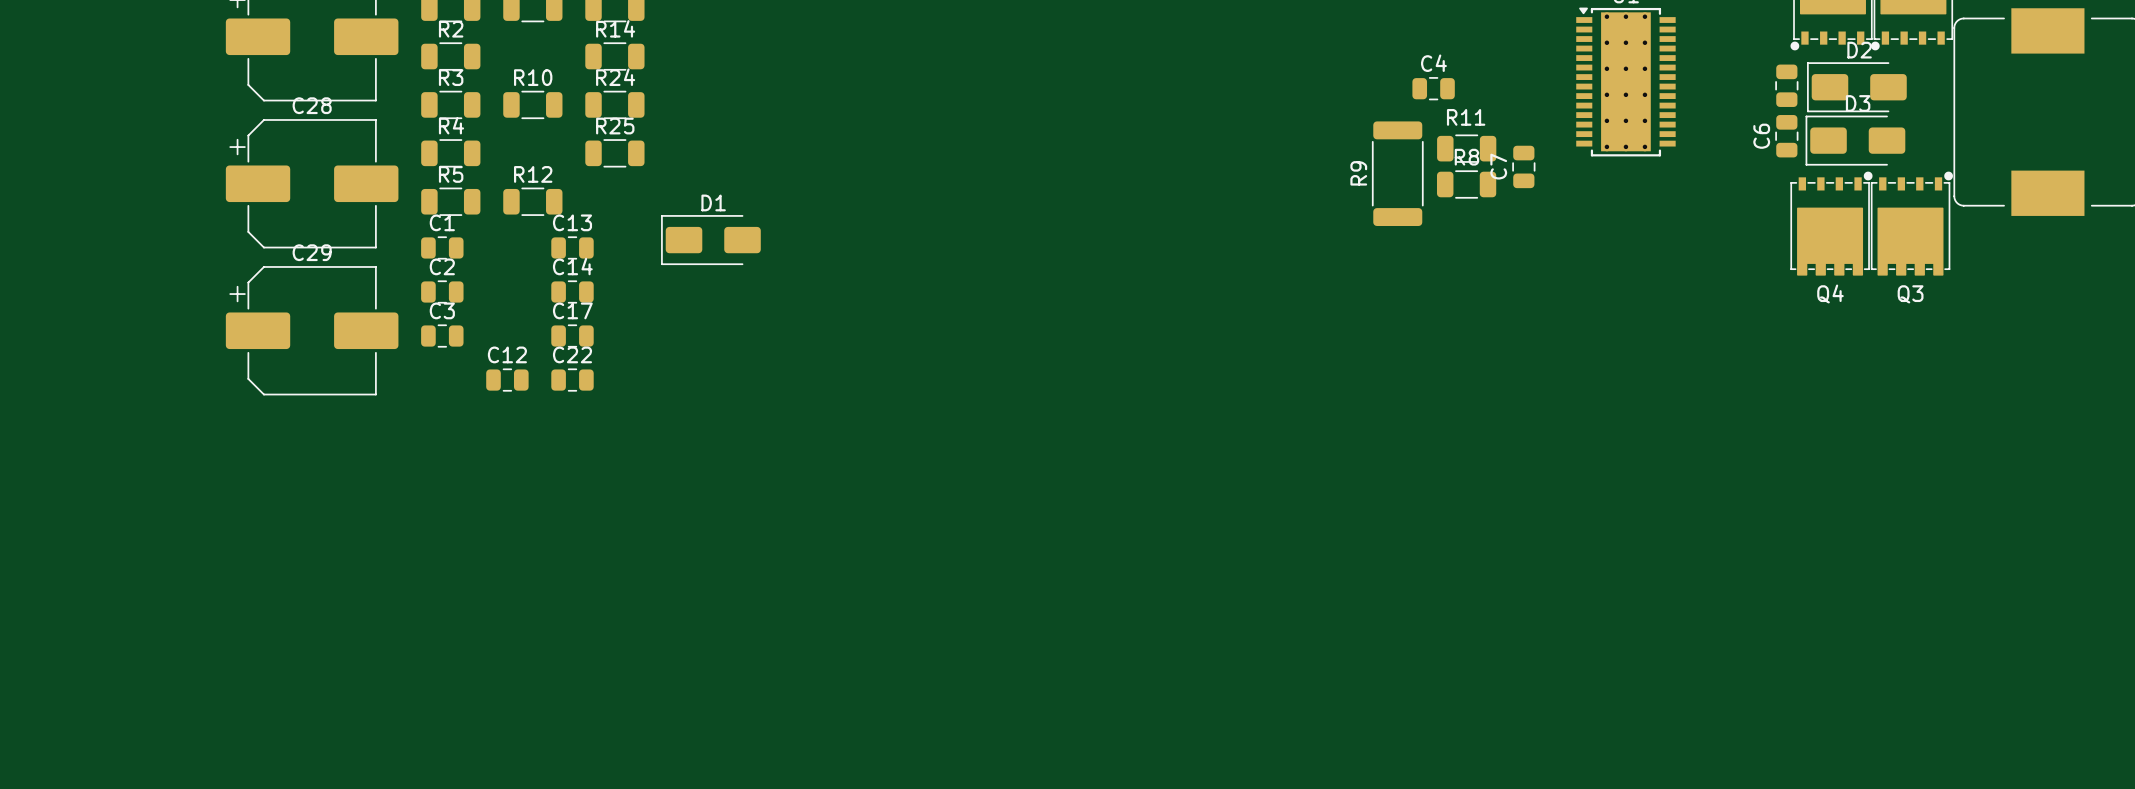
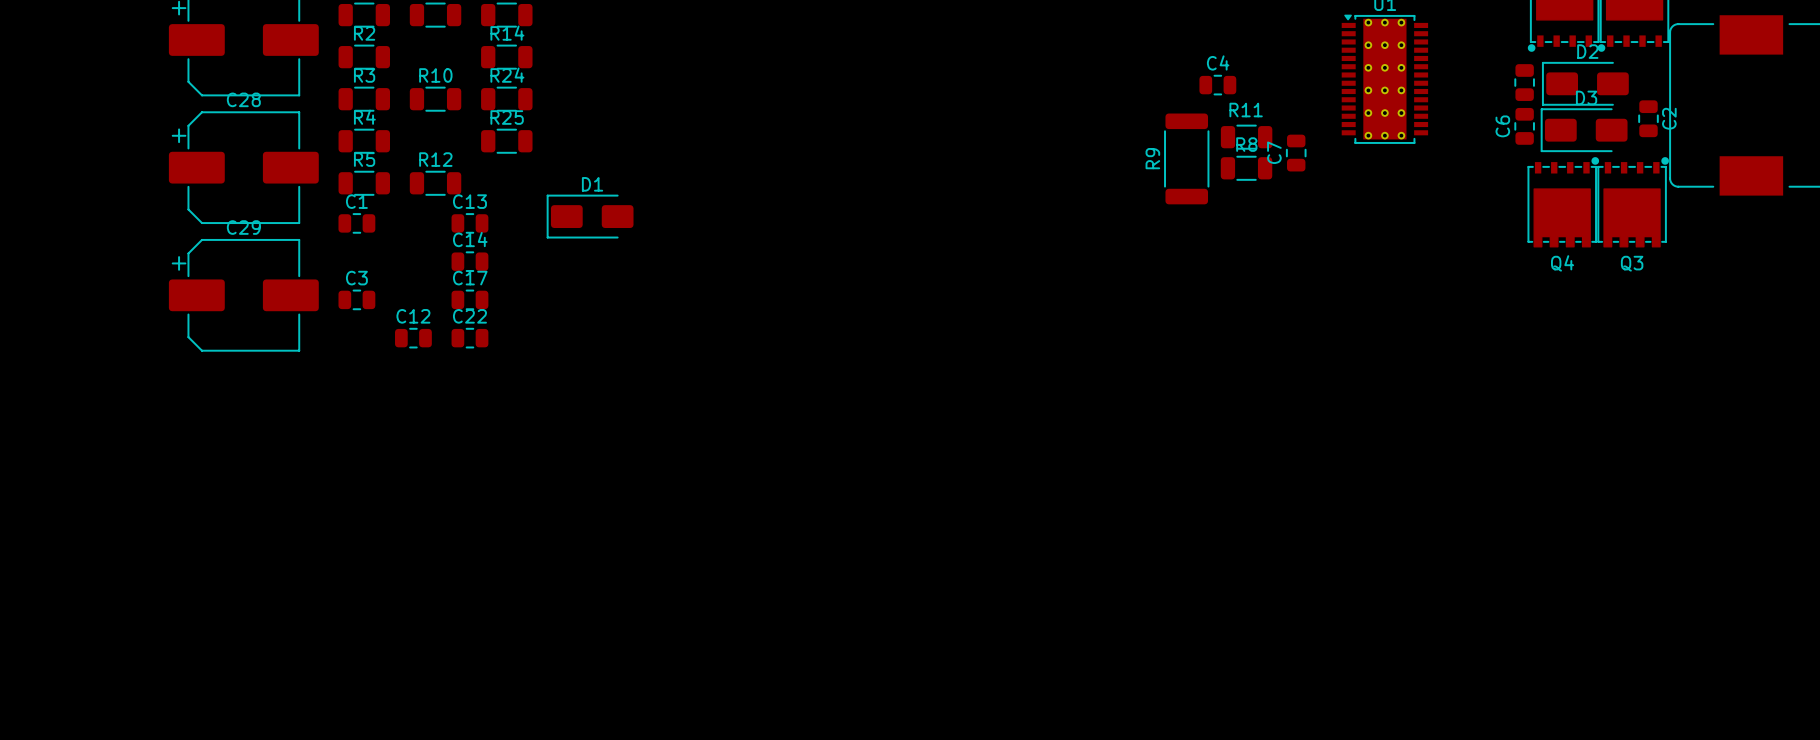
C2 rotation: 0° (442, 291) -> 90° clockwise (1648, 118)
C2 position: (442, 291) -> (1648, 118)

